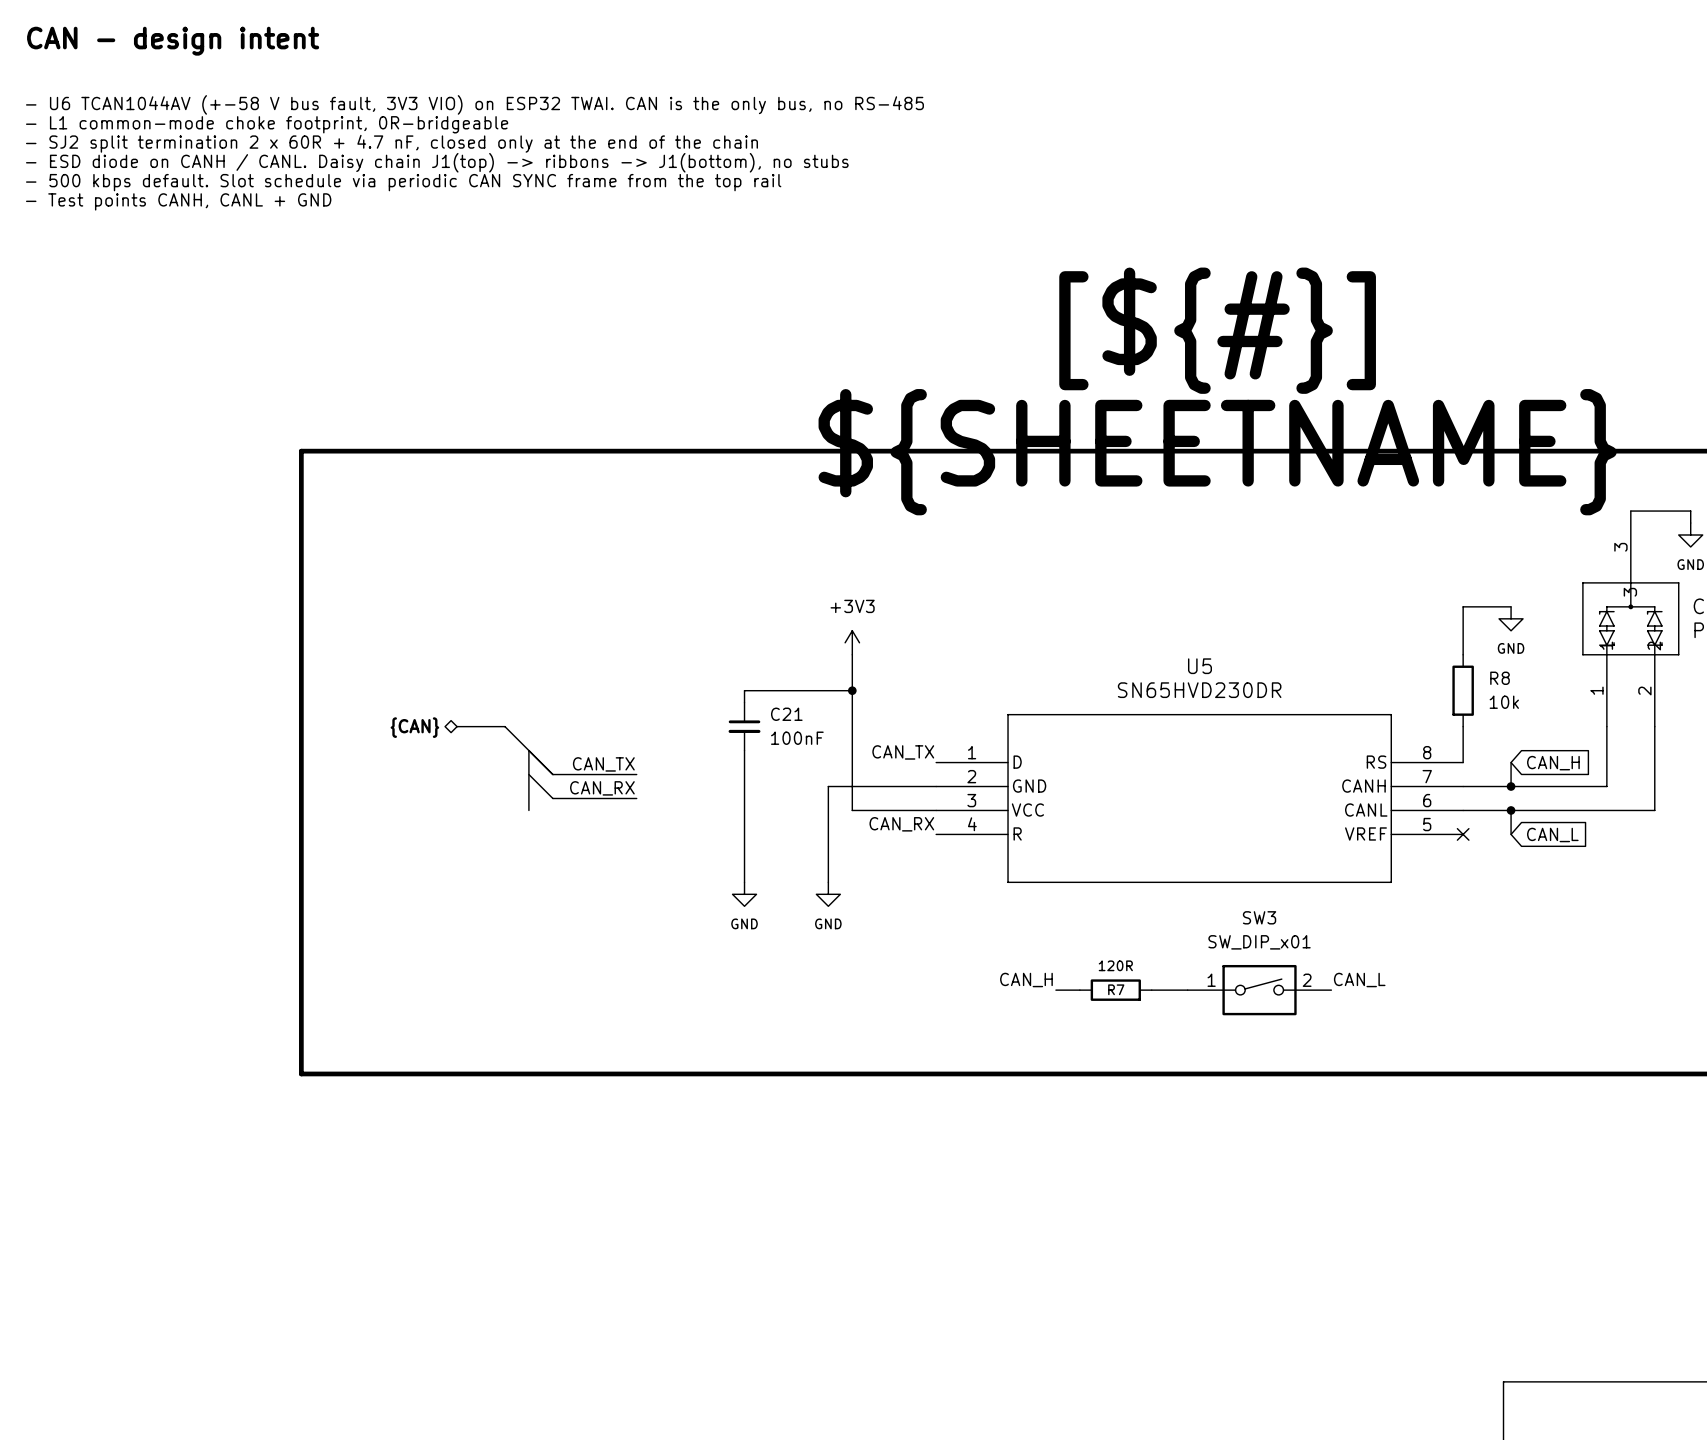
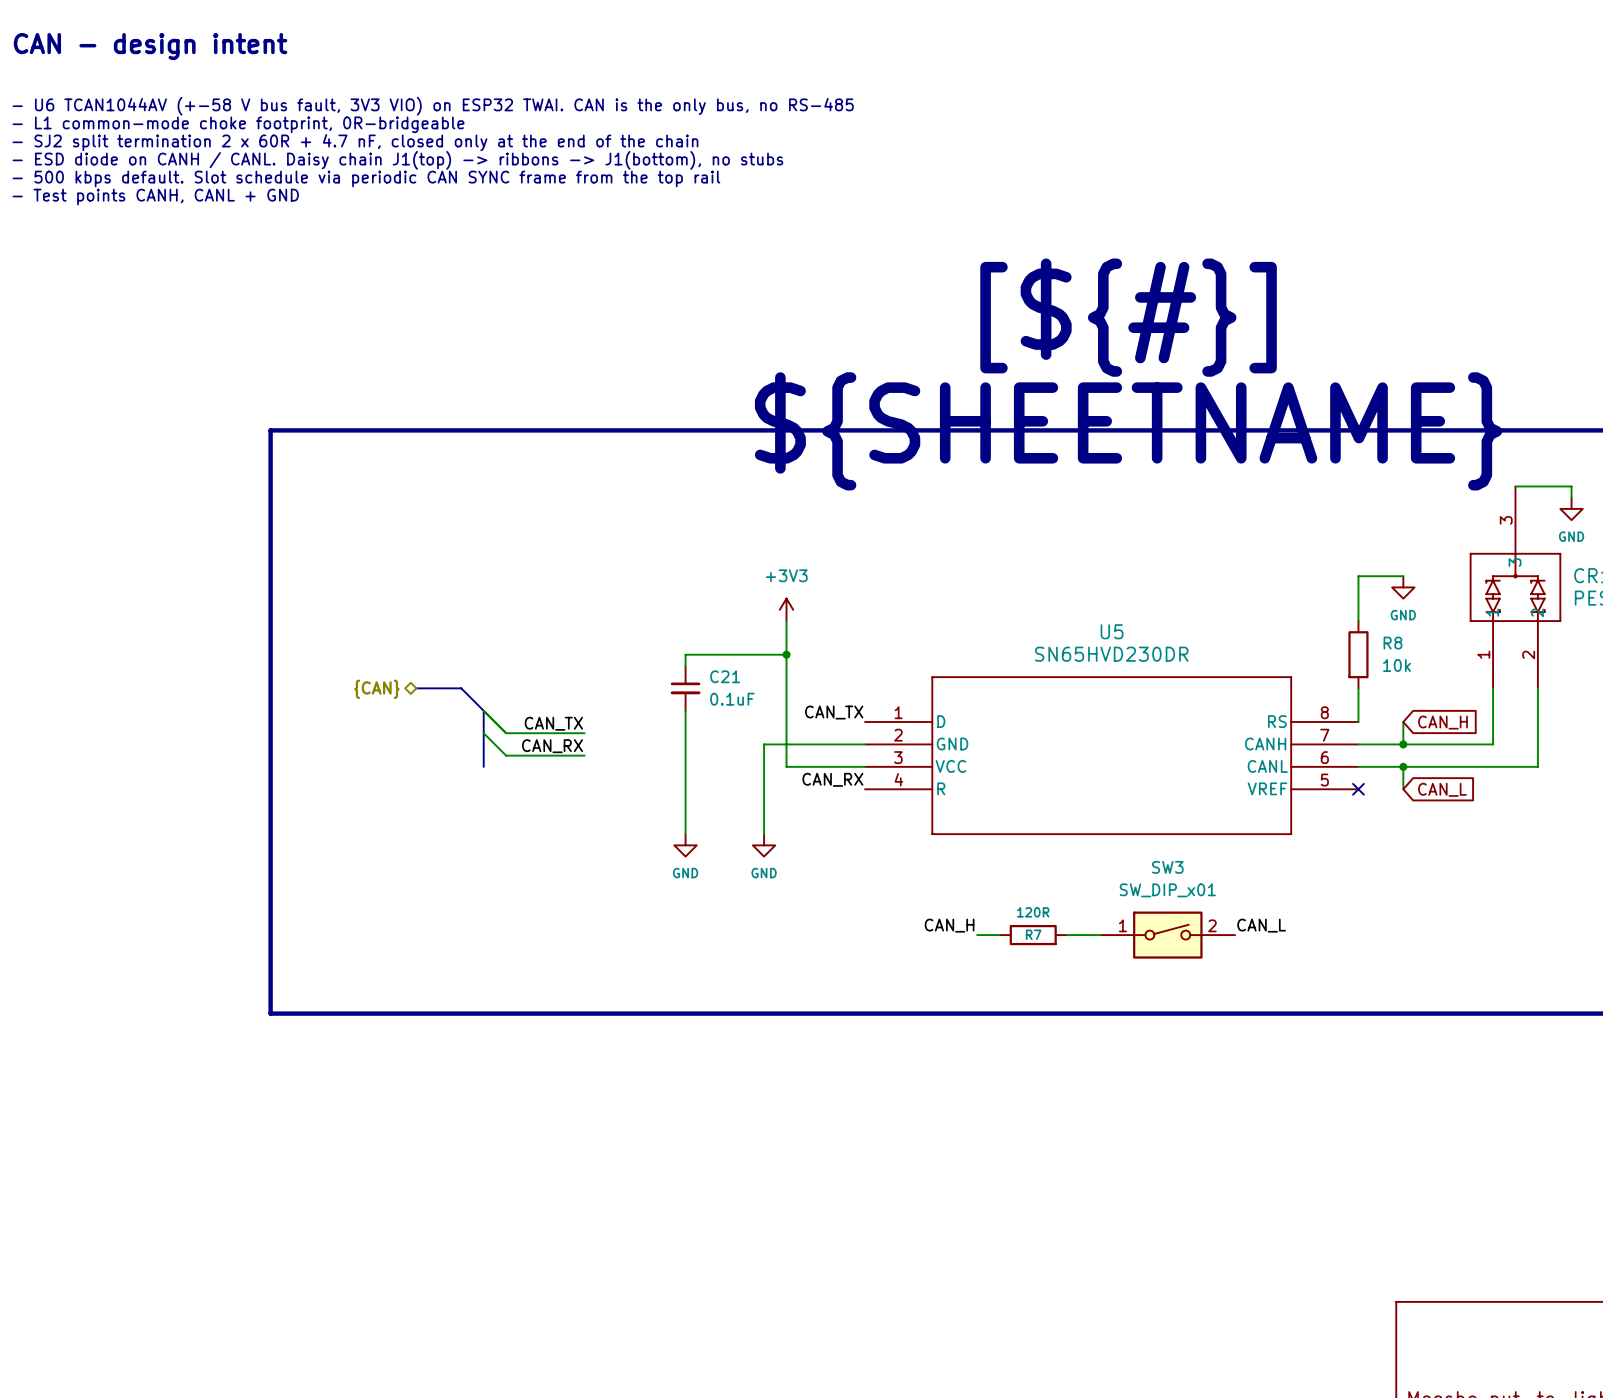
C21 value: 100nF (797, 738) -> 0.1uF (732, 699)

